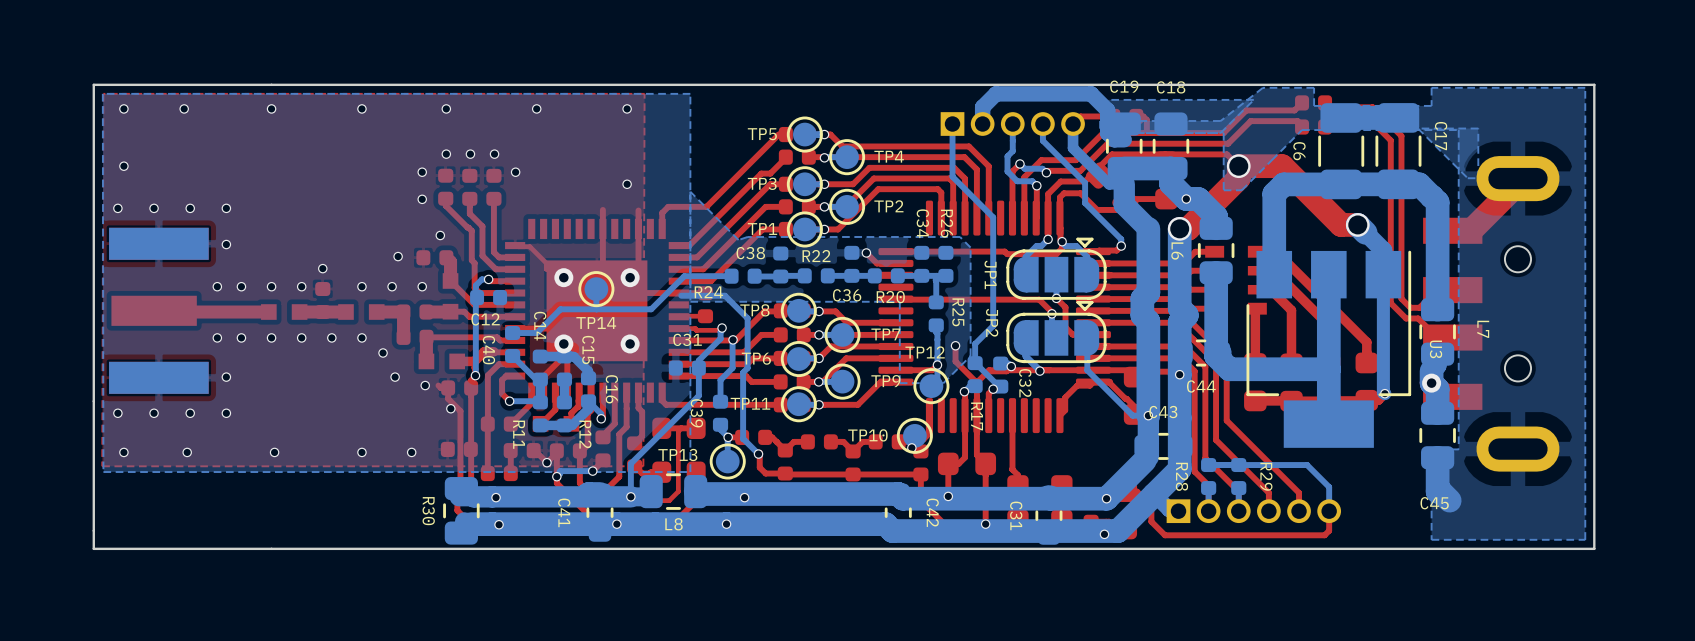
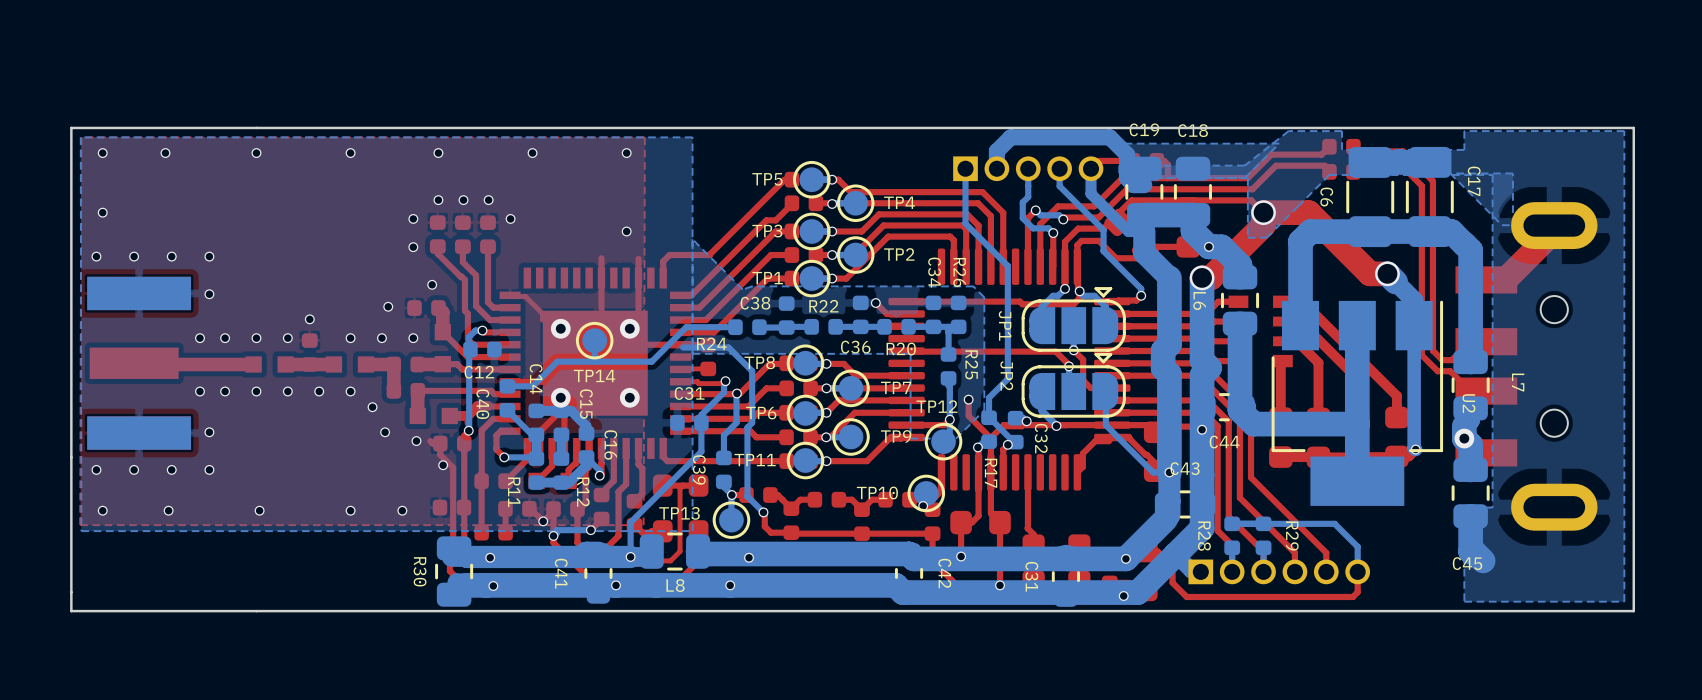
U3 name: U3 (1436, 349) -> U2 (1468, 403)

